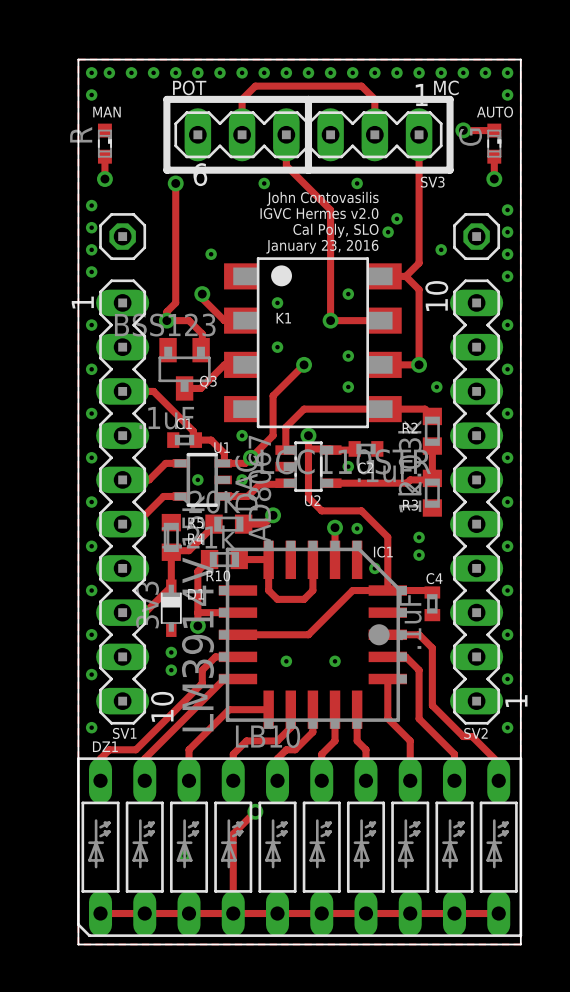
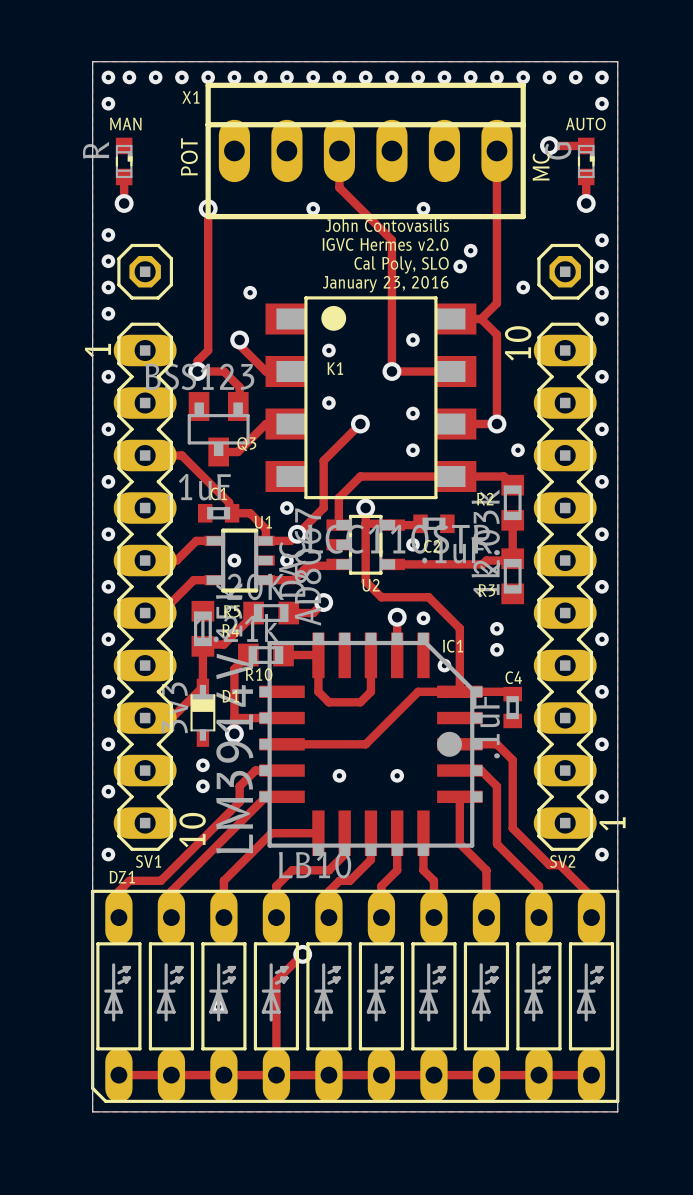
text rotation: 0° (189, 87) -> 90° counterclockwise (189, 156)
text position: POT (189, 87) -> POT (189, 156)
text rotation: 0° (446, 87) -> 90° counterclockwise (541, 167)
text position: MC (446, 87) -> MC (541, 167)
line: (166, 99) (450, 99) (450, 170) (166, 170) (166, 99) -> none
line: (308, 99) (308, 170) -> none
track: (242, 134) (242, 99) (255, 86) (361, 86) (374, 99) (374, 134) -> none
SV3: (308, 134) -> none
X1: none -> (365, 150)

